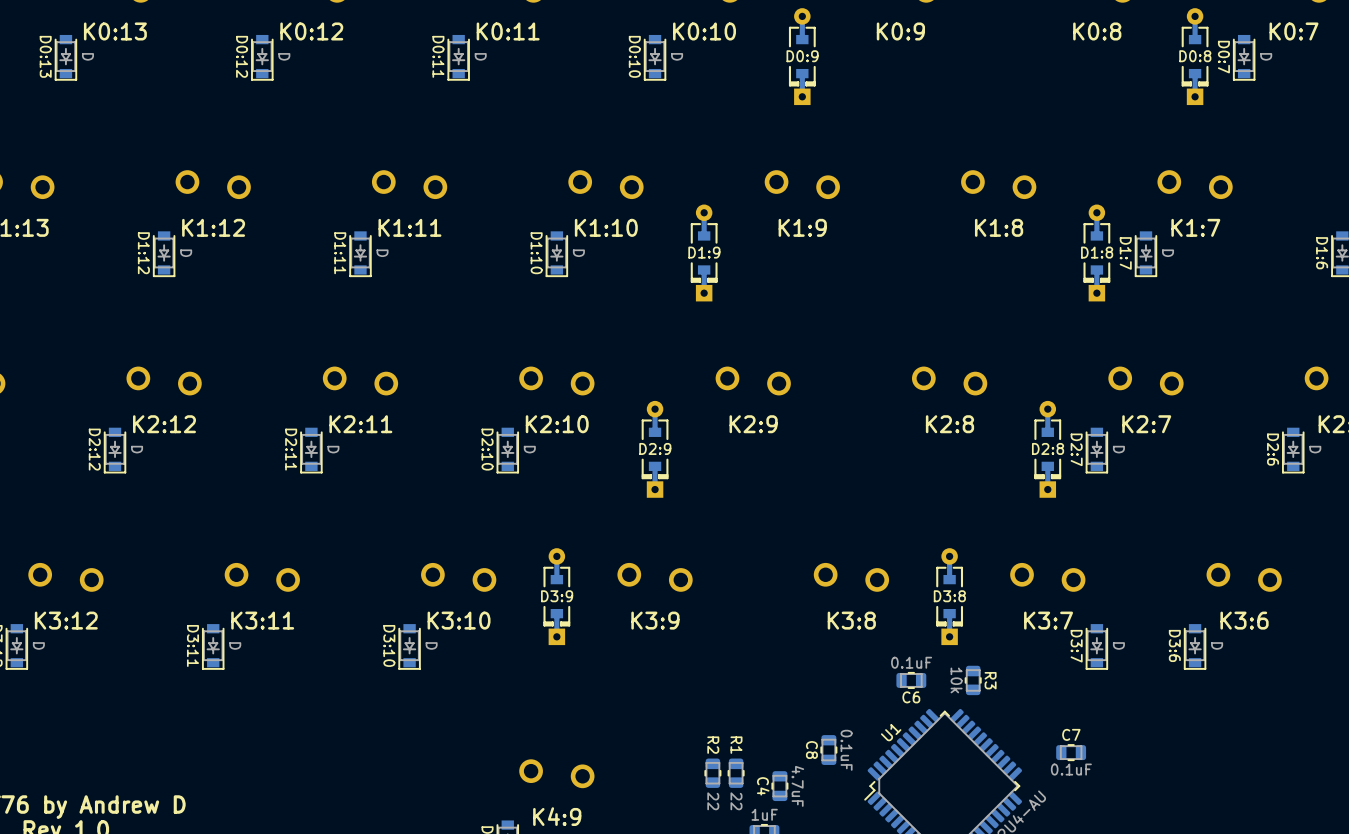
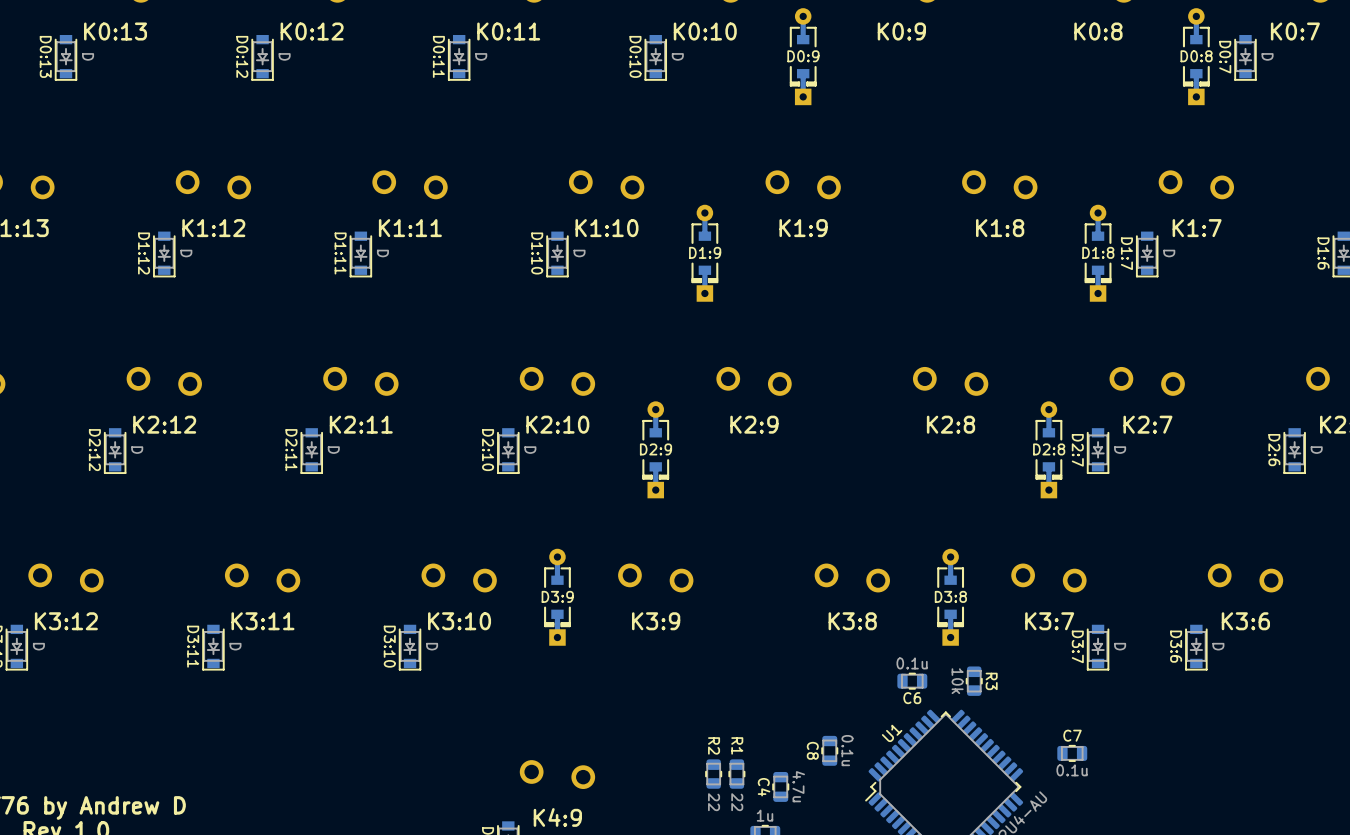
C6 value: 0.1uF (911, 662) -> 0.1u (912, 663)
C8 value: 0.1uF (846, 750) -> 0.1u (847, 750)
C7 value: 0.1uF (1071, 769) -> 0.1u (1072, 770)
C4 value: 4.7uF (797, 786) -> 4.7u (798, 786)
part value: 1uF (764, 814) -> 1u (765, 815)

